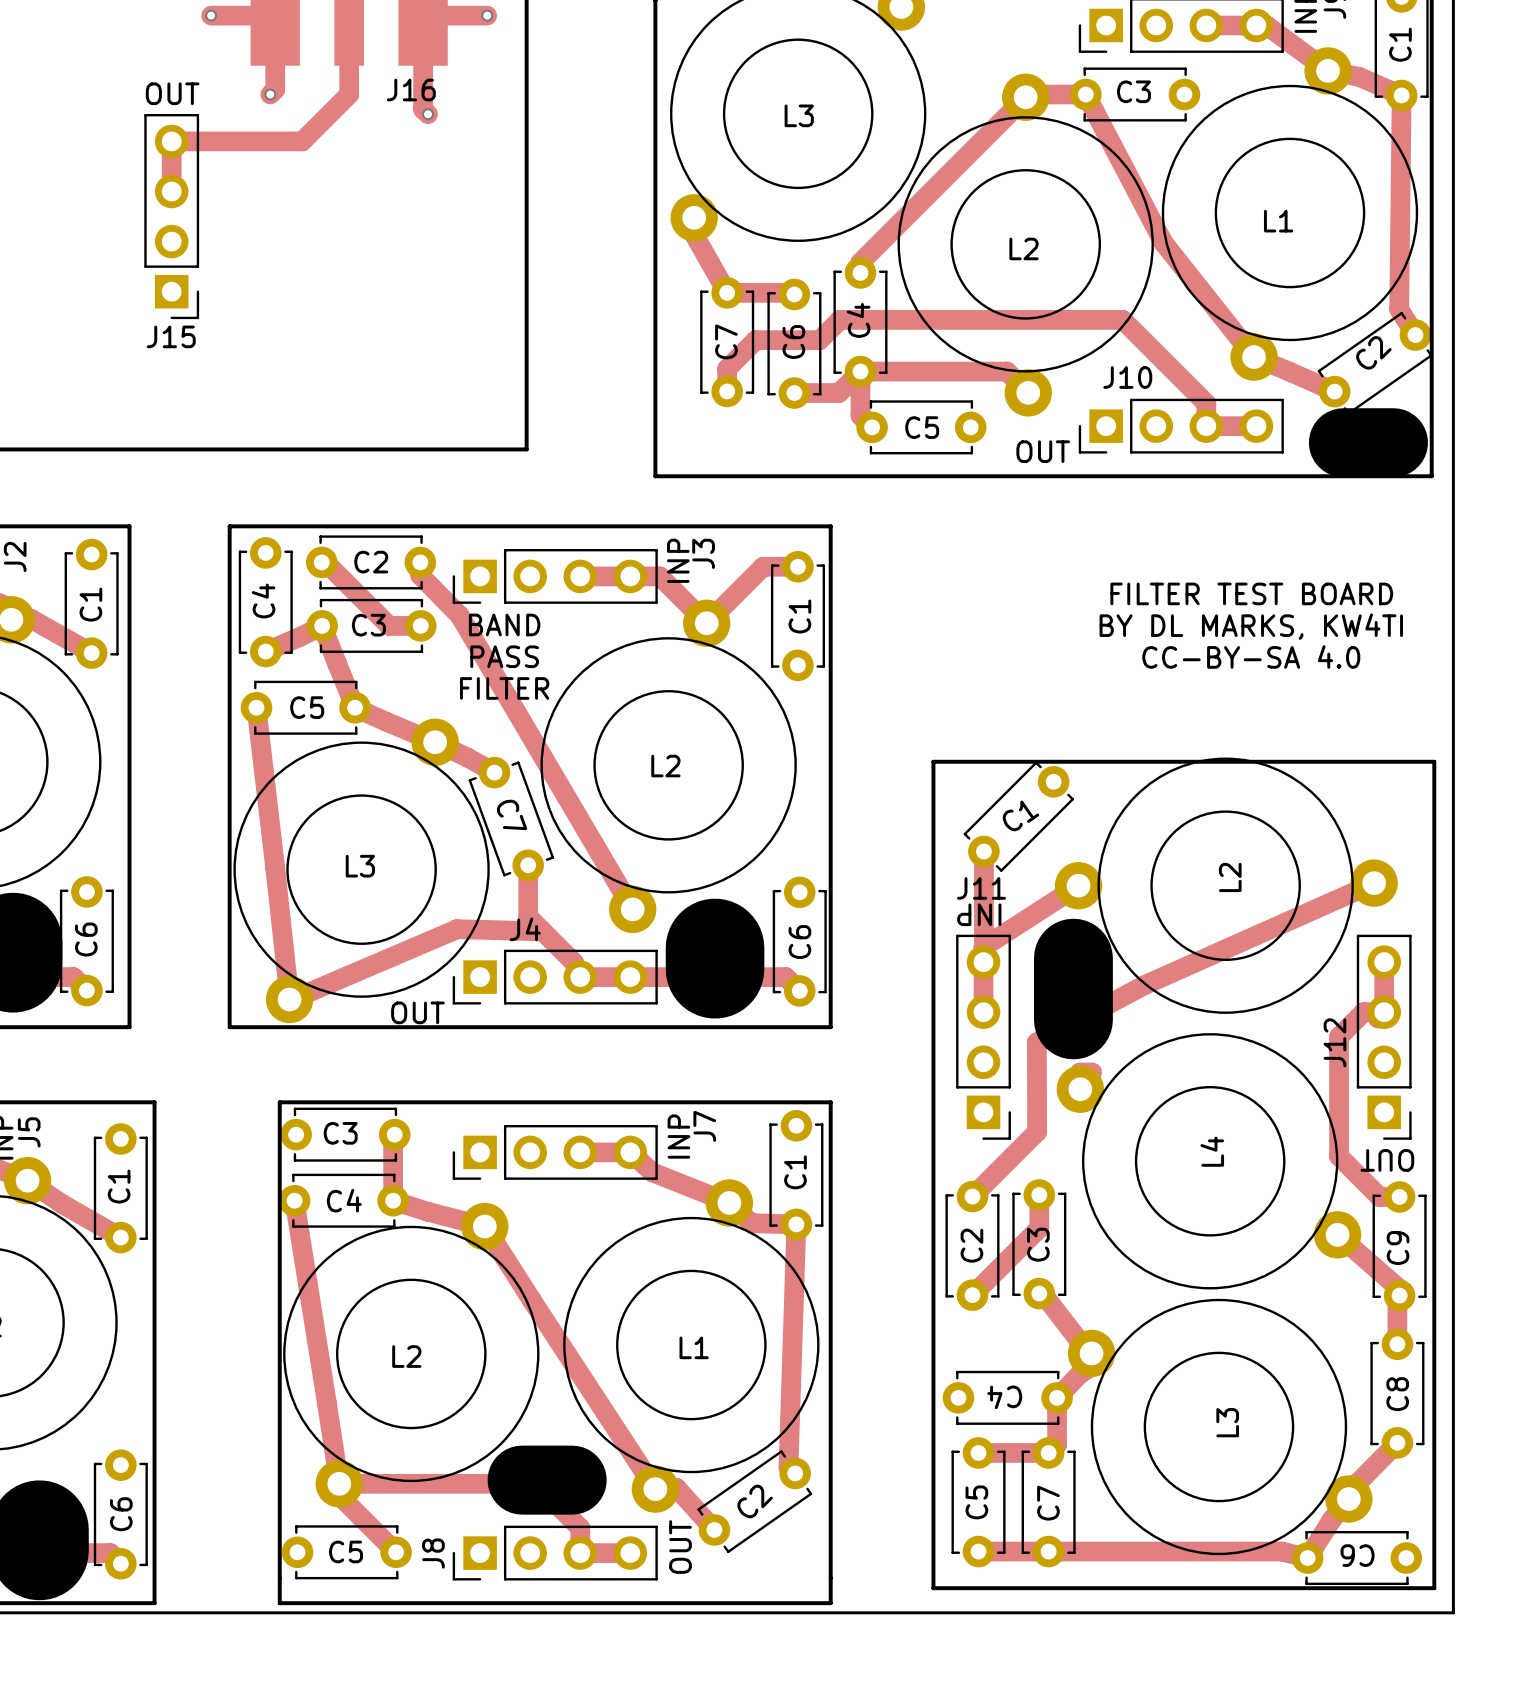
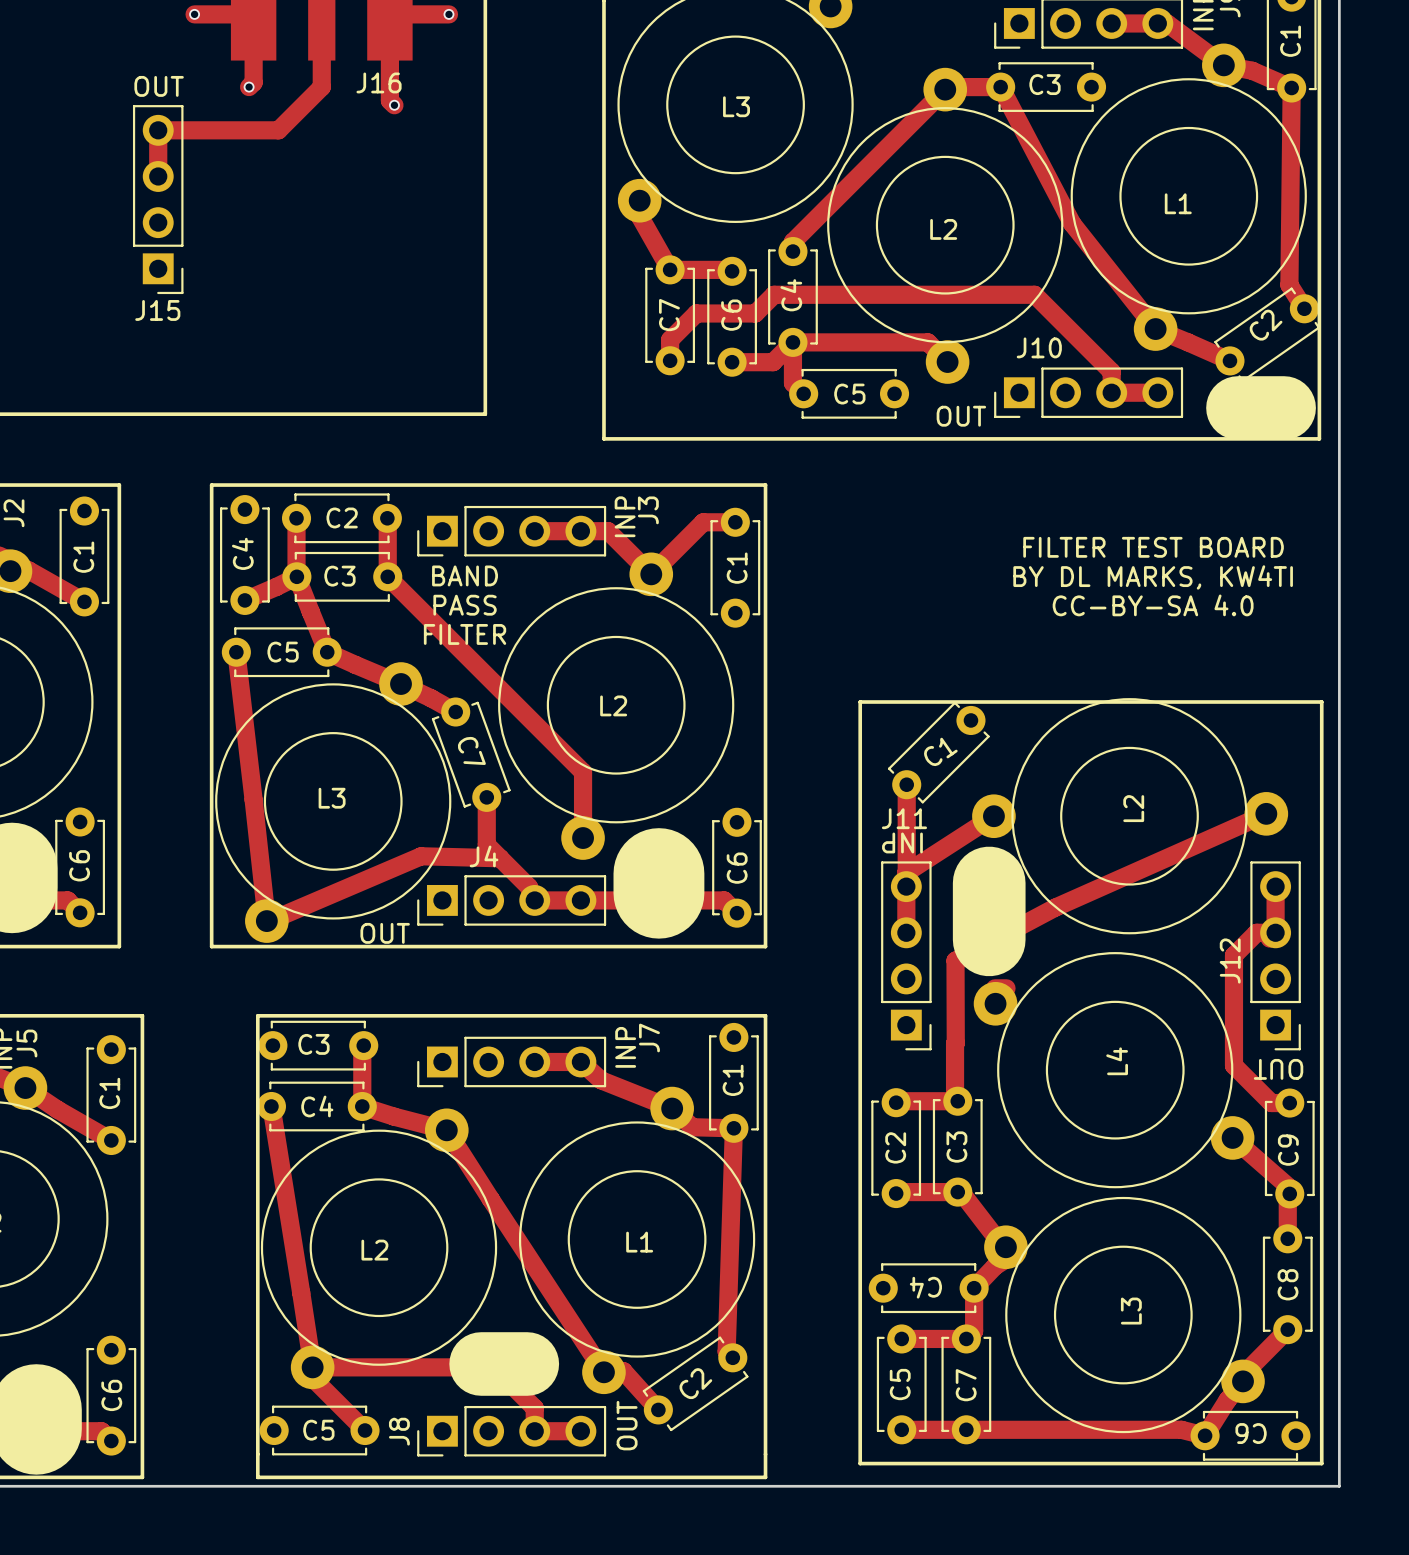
track: none -> (296, 518) (296, 576)
track: (325, 562) (389, 625) (420, 625) -> none
track: (420, 562) (420, 575) (459, 615) (632, 909) -> (387, 518) (387, 576) (583, 772) (583, 838)
track: (1036, 1132) (974, 1195) -> (955, 1043) (955, 1098) (957, 1101) (897, 1101)
track: (1039, 1195) (1039, 1228) (974, 1293) -> (957, 1192) (897, 1192)

